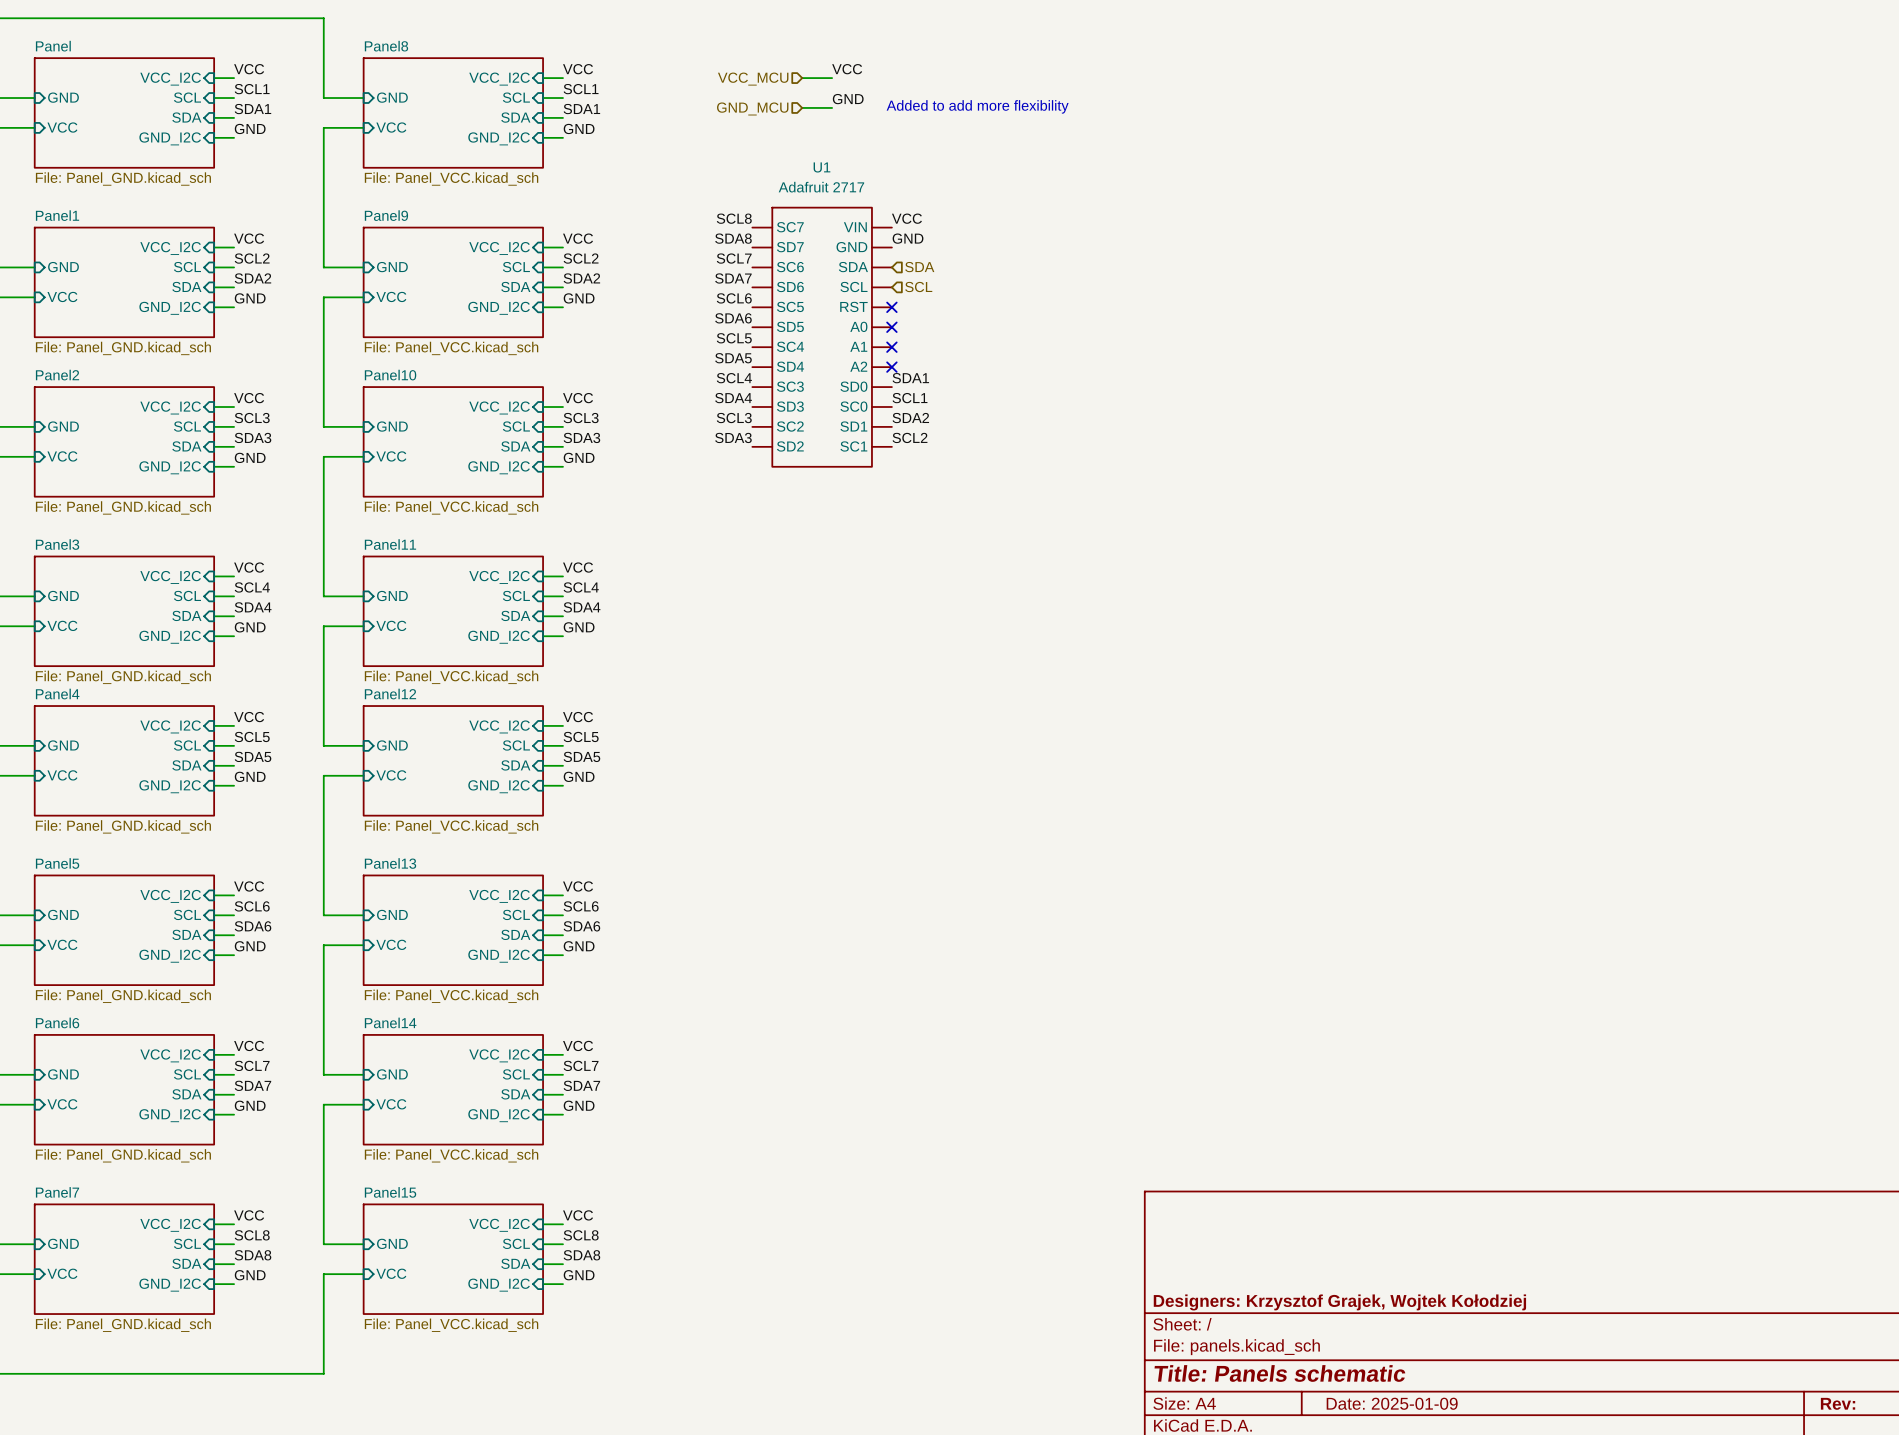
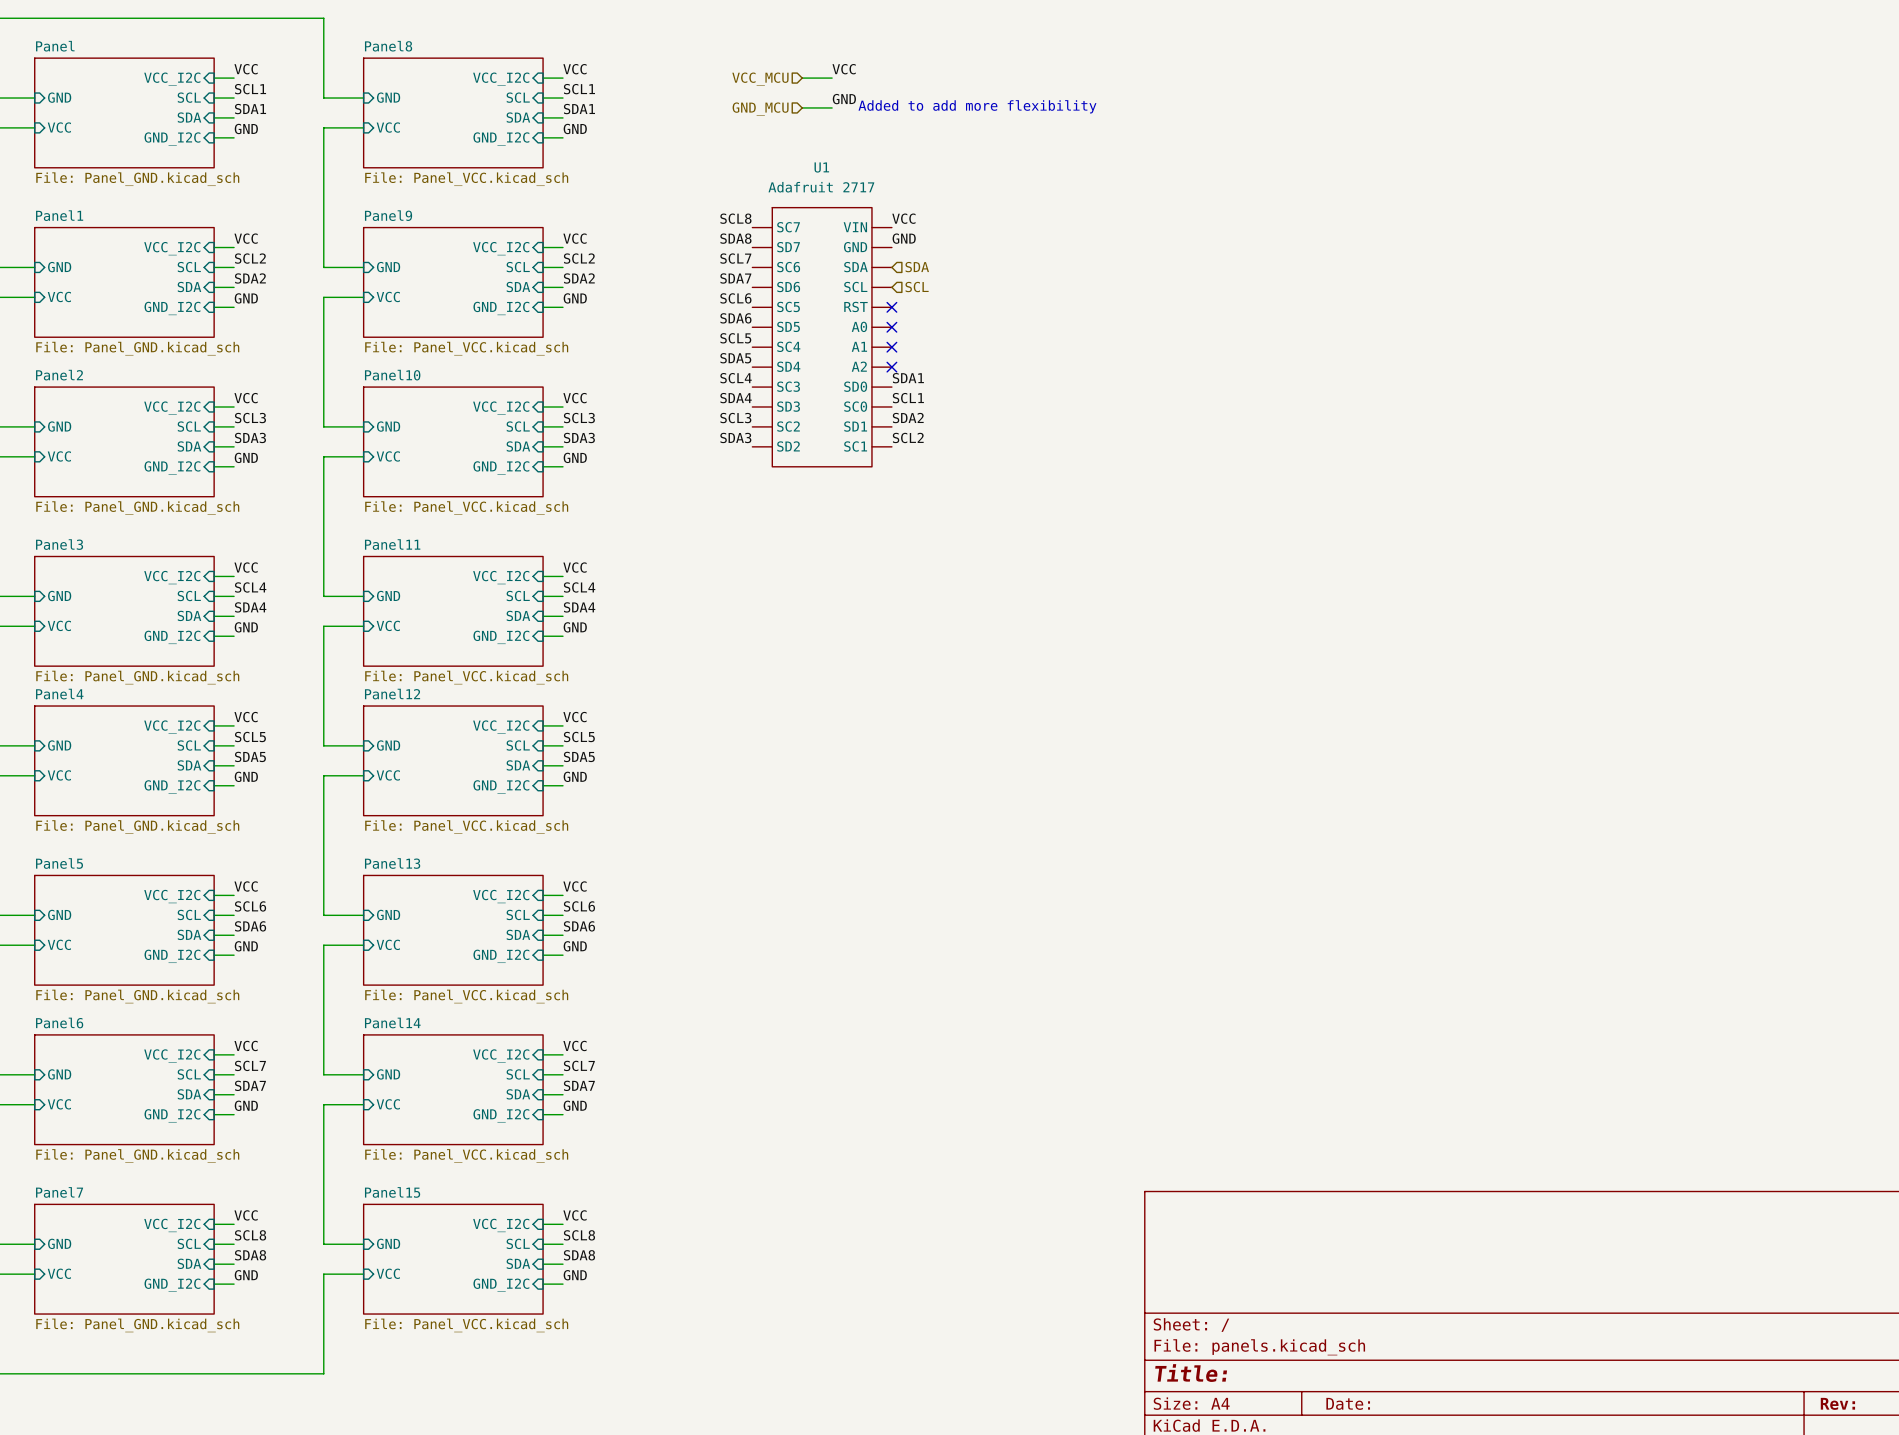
title block: Designers: Krzysztof Grajek, Wojtek Kołodziej (1339, 1302) -> none
title block: Title: Panels schematic (1279, 1373) -> Title: (1191, 1373)
title block: Date: 2025-01-09 (1392, 1403) -> Date: (1348, 1403)

